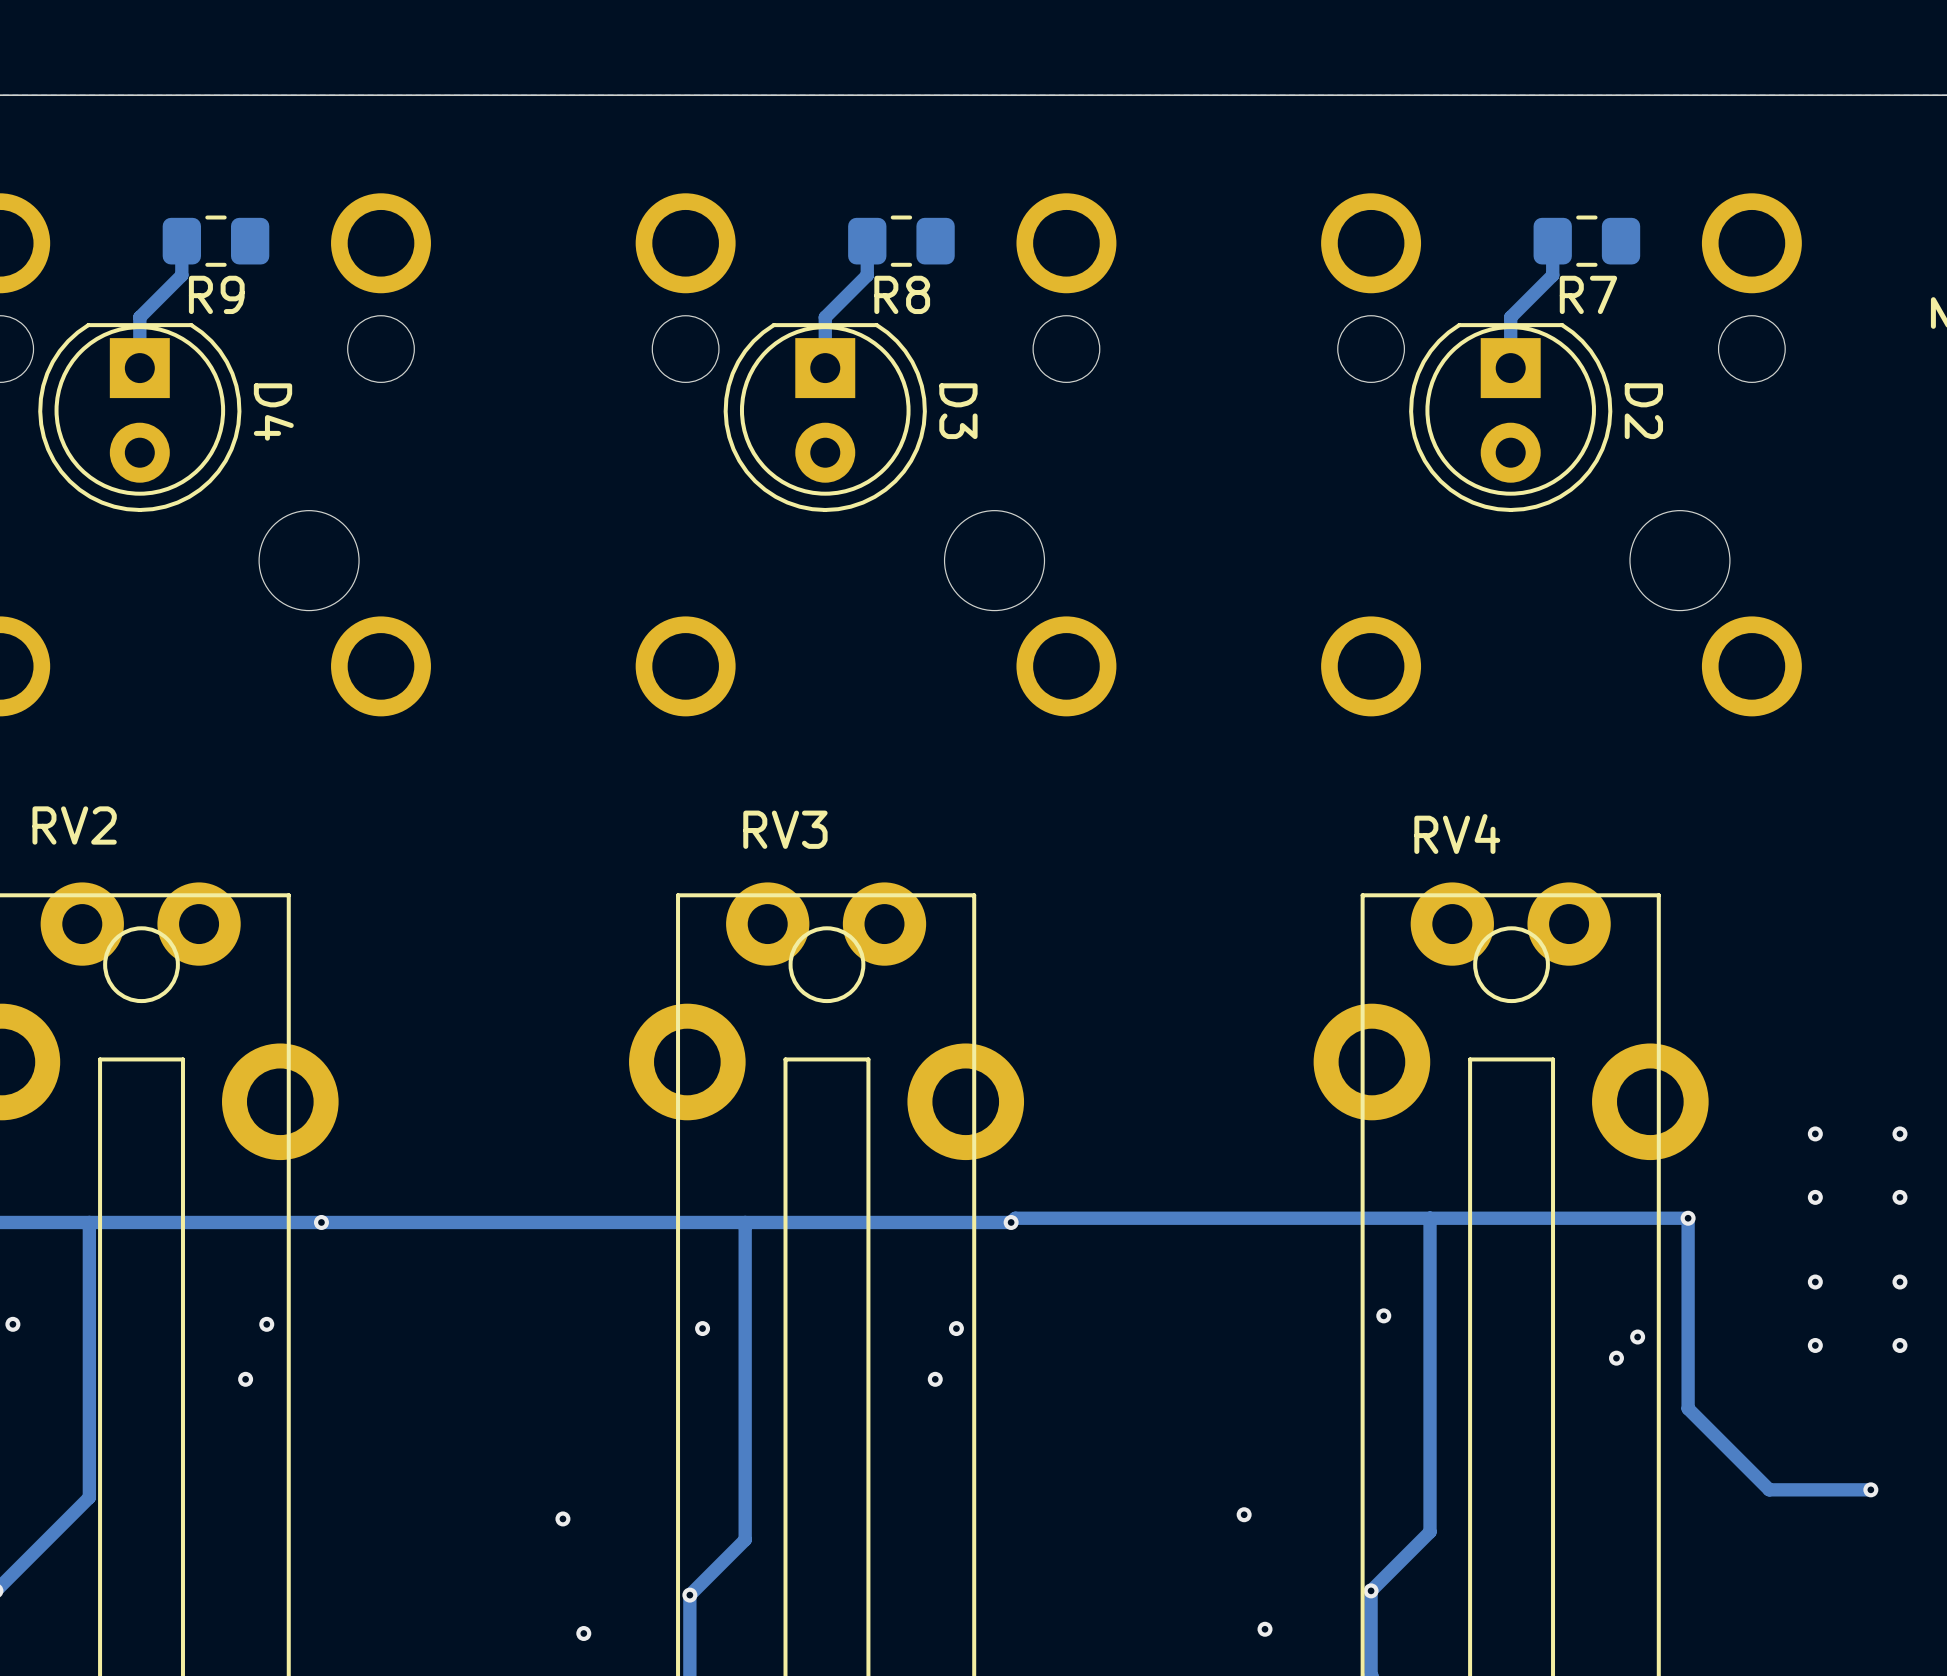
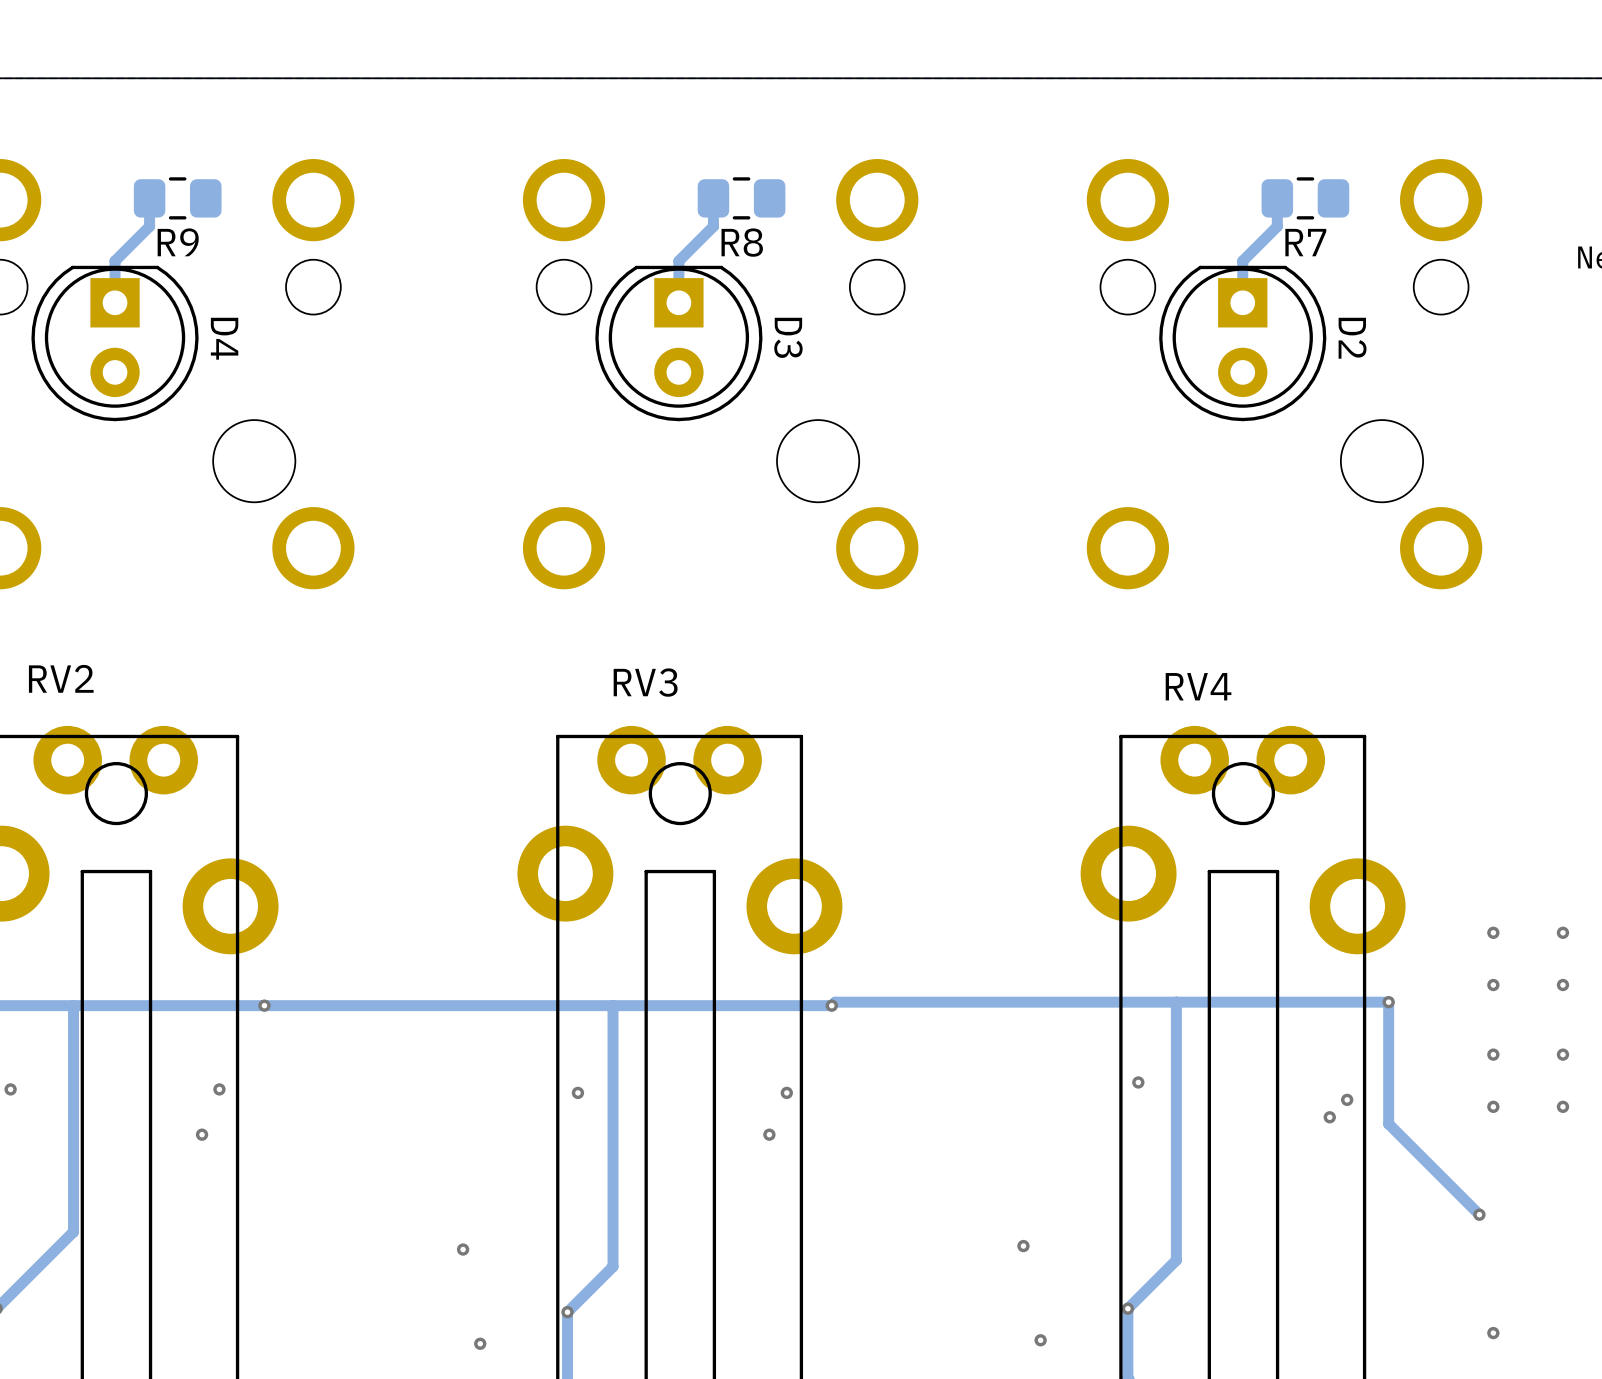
track: (1688, 1366) (1688, 1408) (1769, 1489) (1870, 1489) -> (1388, 1123) (1479, 1214)
via: none -> (1479, 1214)
via: (1870, 1489) -> none
via: none -> (1493, 1333)

